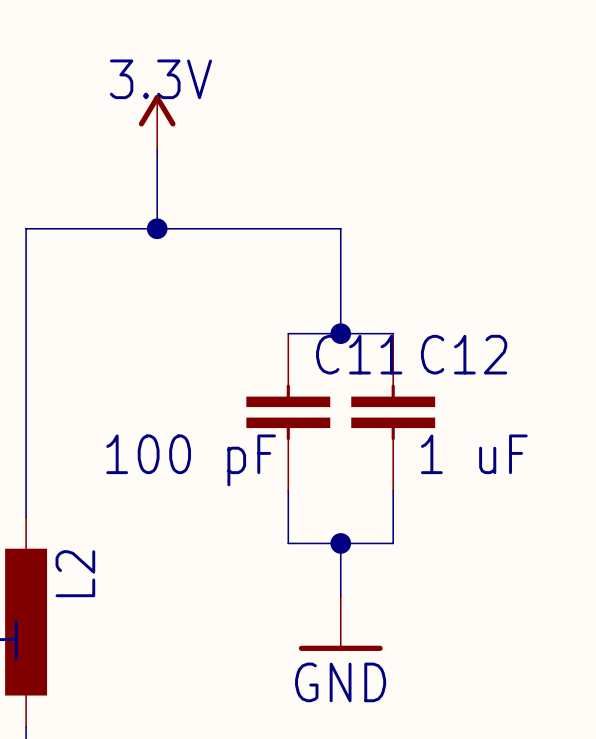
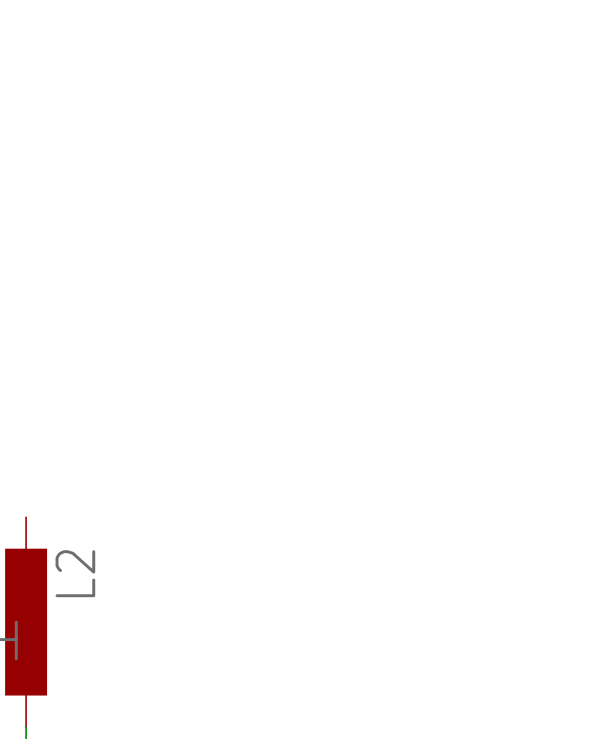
power symbol: 3.3V (157, 122) -> none
wire: (157, 150) (157, 228) -> none
junction: (157, 228) -> none
wire: (288, 333) (393, 333) -> none
wire: (340, 333) (340, 228) (26, 228) (26, 517) -> none
junction: (340, 333) -> none
C11: 100 pF (288, 412) -> none
C12: 1 uF (393, 412) -> none
wire: (288, 491) (288, 543) (393, 543) (393, 491) -> none
wire: (340, 543) (340, 595) -> none
junction: (340, 543) -> none
power symbol: GND (340, 623) -> none

